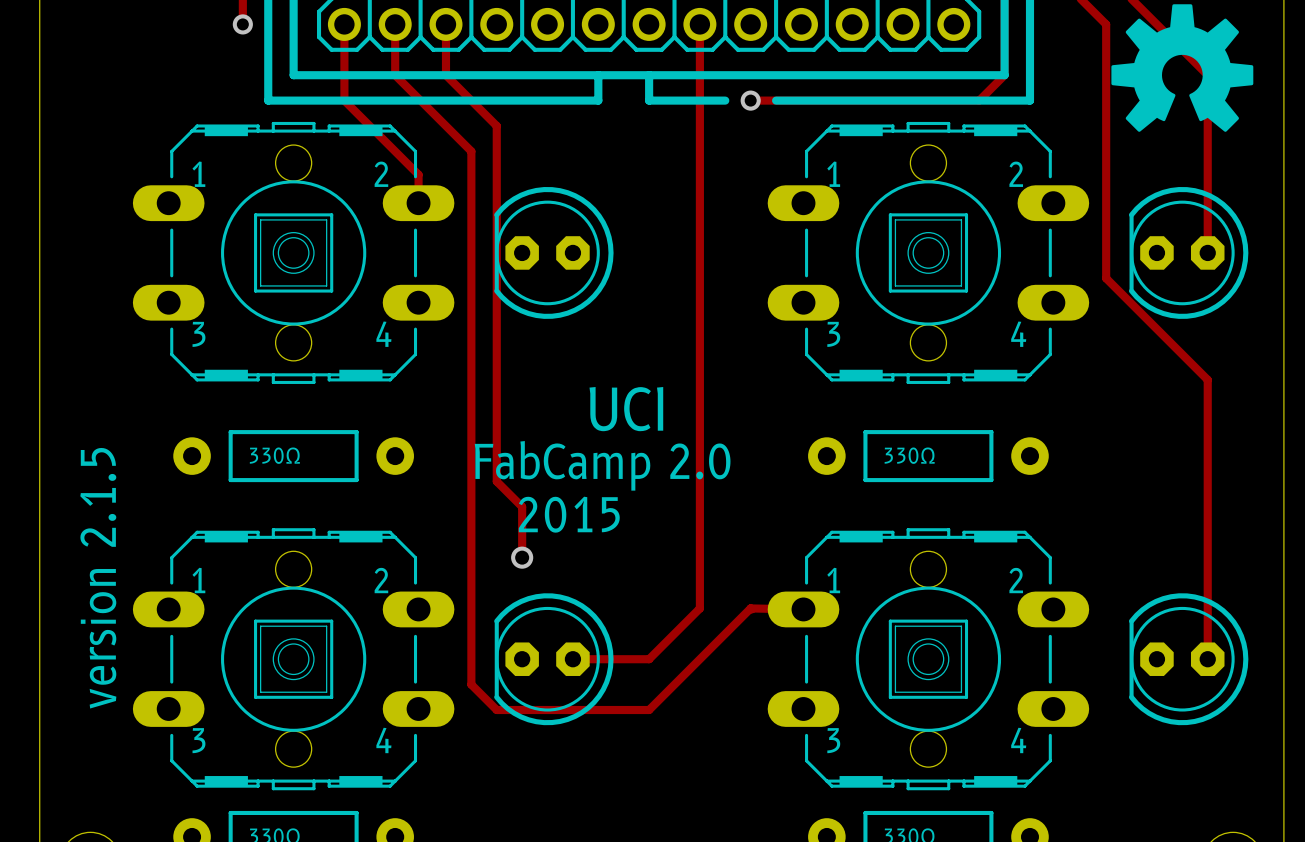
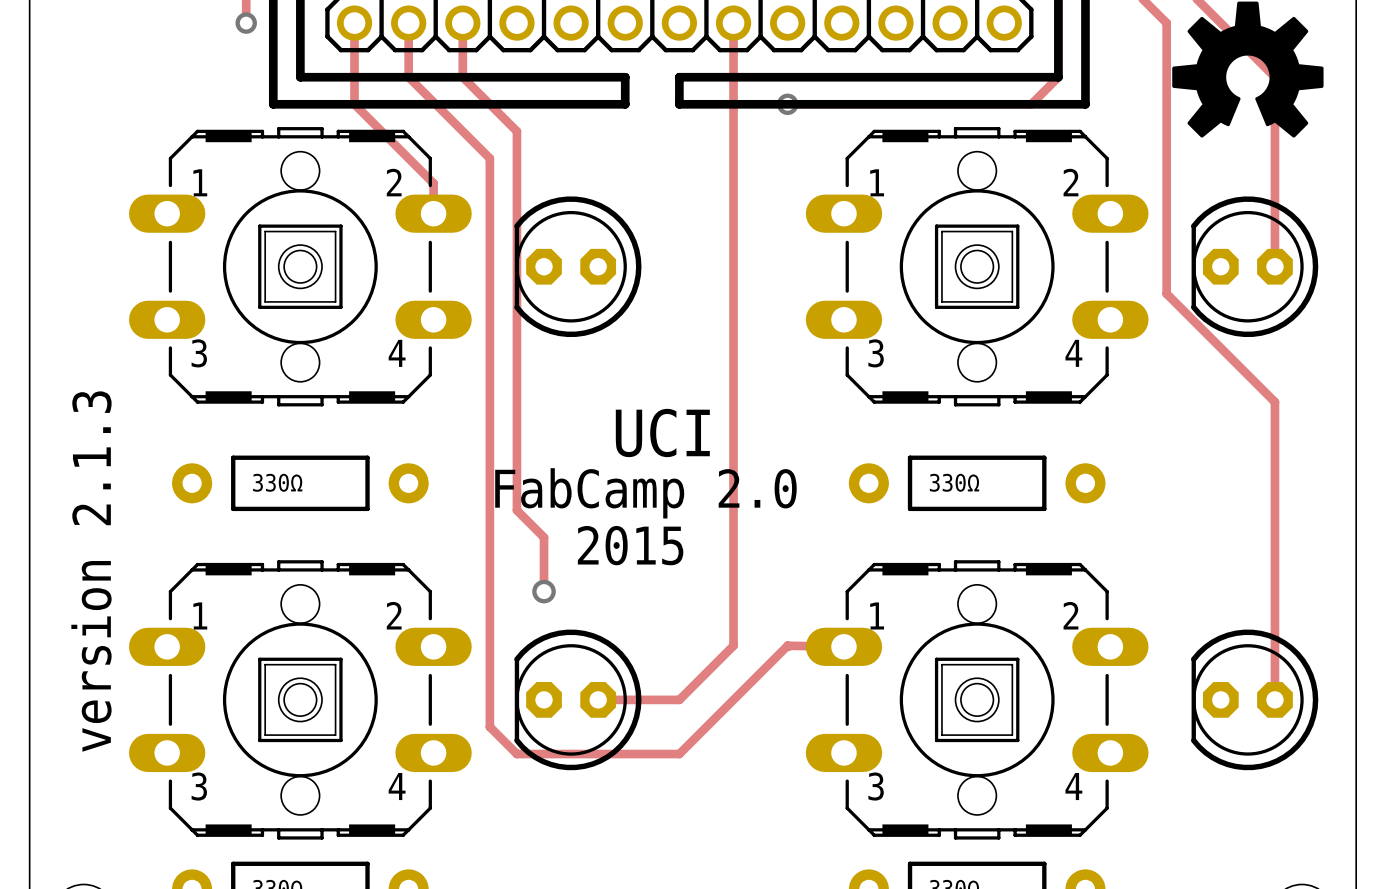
line: (598, 75) (649, 75) -> (760, 104) (814, 104)
text: version 2.1.5 (98, 578) -> version 2.1.3 (91, 571)

